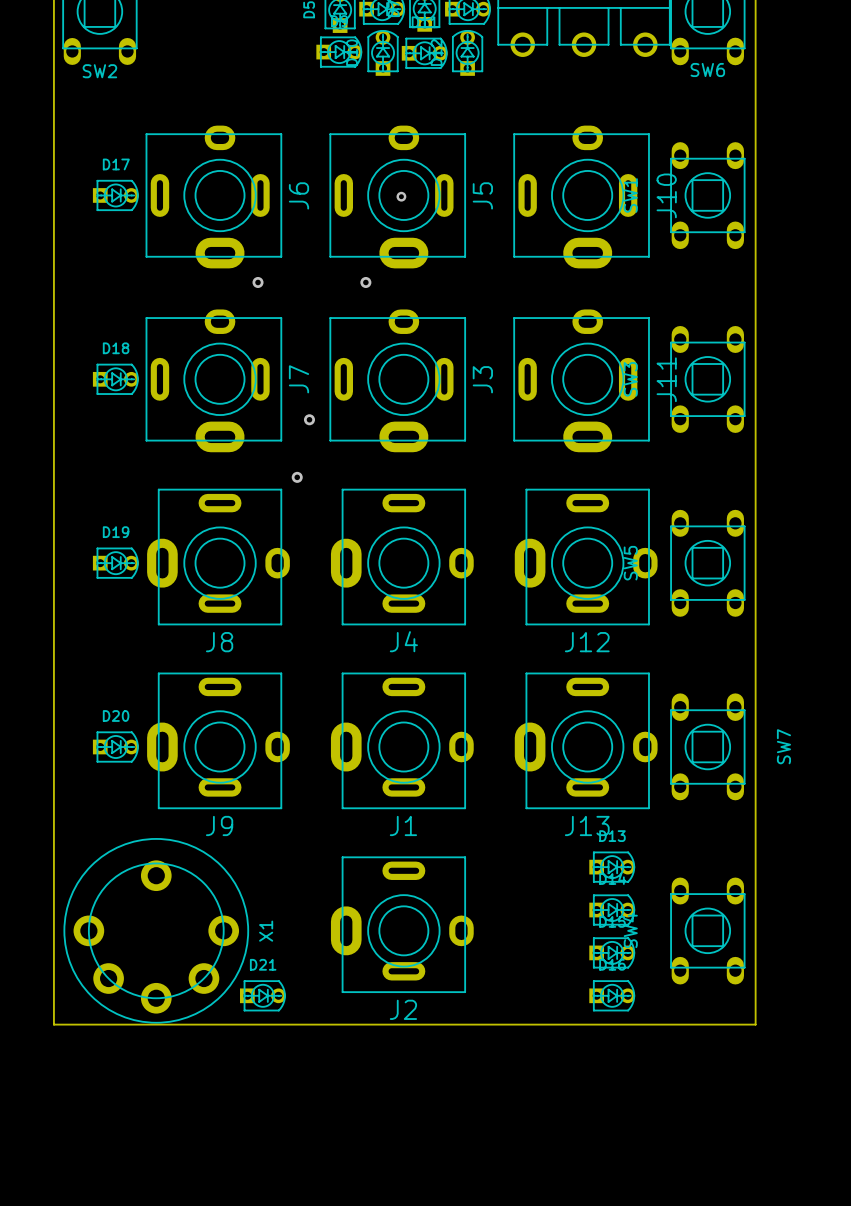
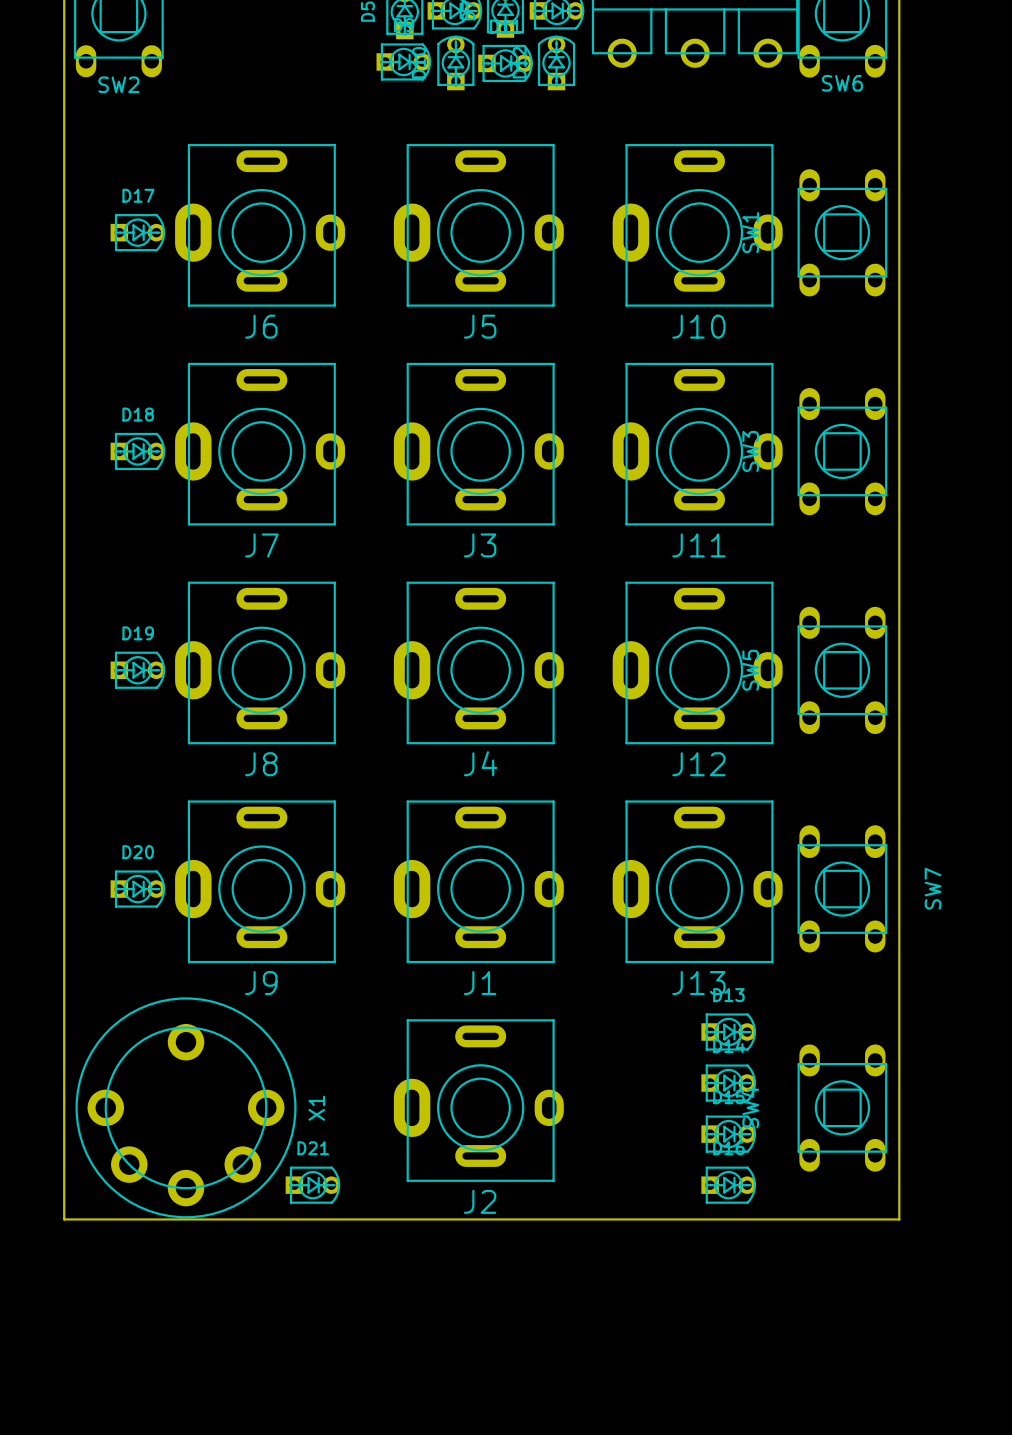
via: (401, 196) -> none
J6 rotation: 0° (213, 197) -> 90° clockwise (260, 225)
J5 rotation: 0° (397, 197) -> 90° clockwise (478, 225)
J10 rotation: 0° (581, 197) -> 90° clockwise (697, 225)
via: (258, 282) -> none
via: (365, 282) -> none
J7 rotation: 0° (213, 380) -> 90° clockwise (260, 444)
J3 rotation: 0° (397, 380) -> 90° clockwise (478, 444)
J11 rotation: 0° (581, 380) -> 90° clockwise (697, 444)
via: (309, 419) -> none
via: (297, 477) -> none

